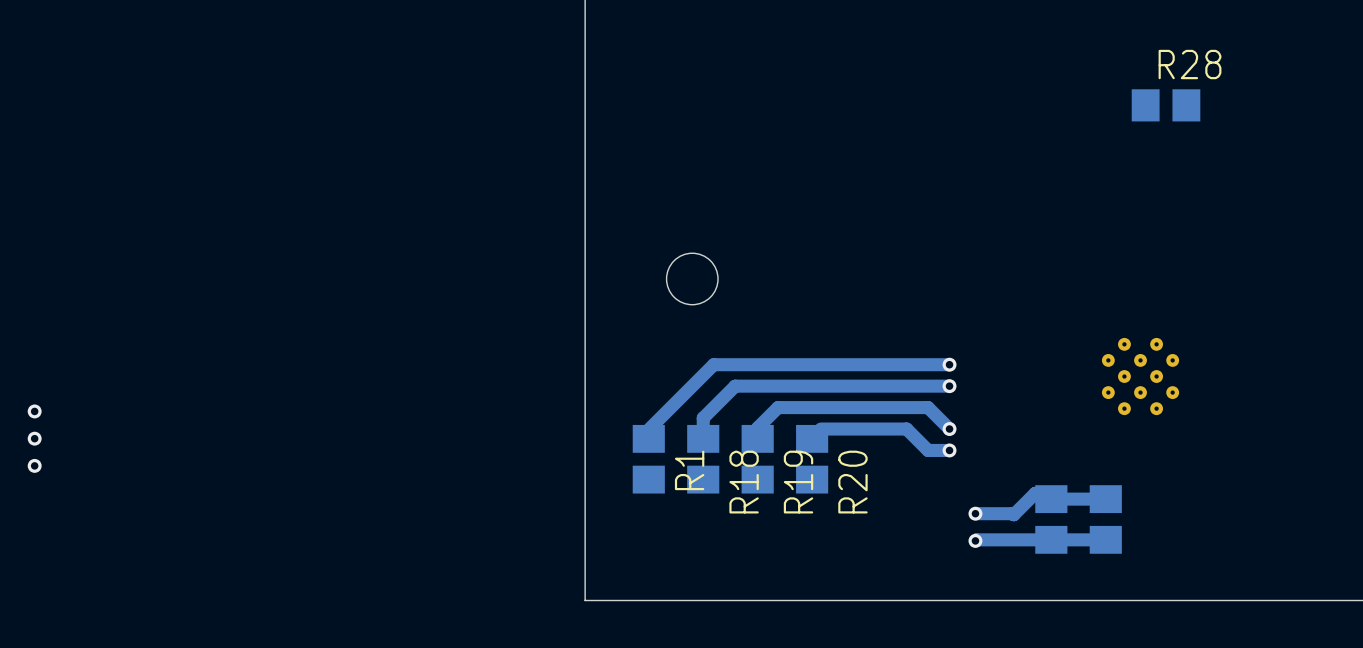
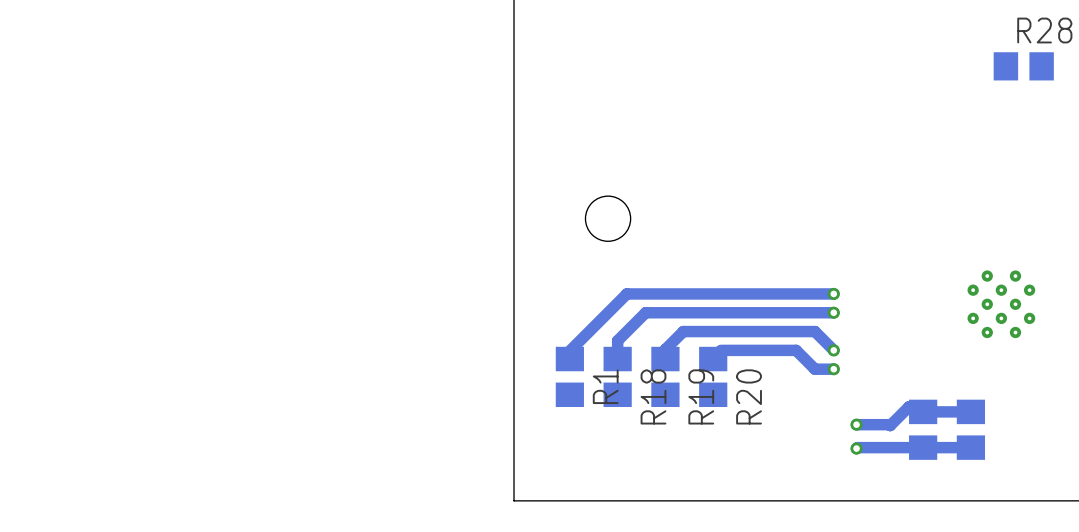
via: (34, 411) -> none
via: (34, 438) -> none
via: (34, 465) -> none

